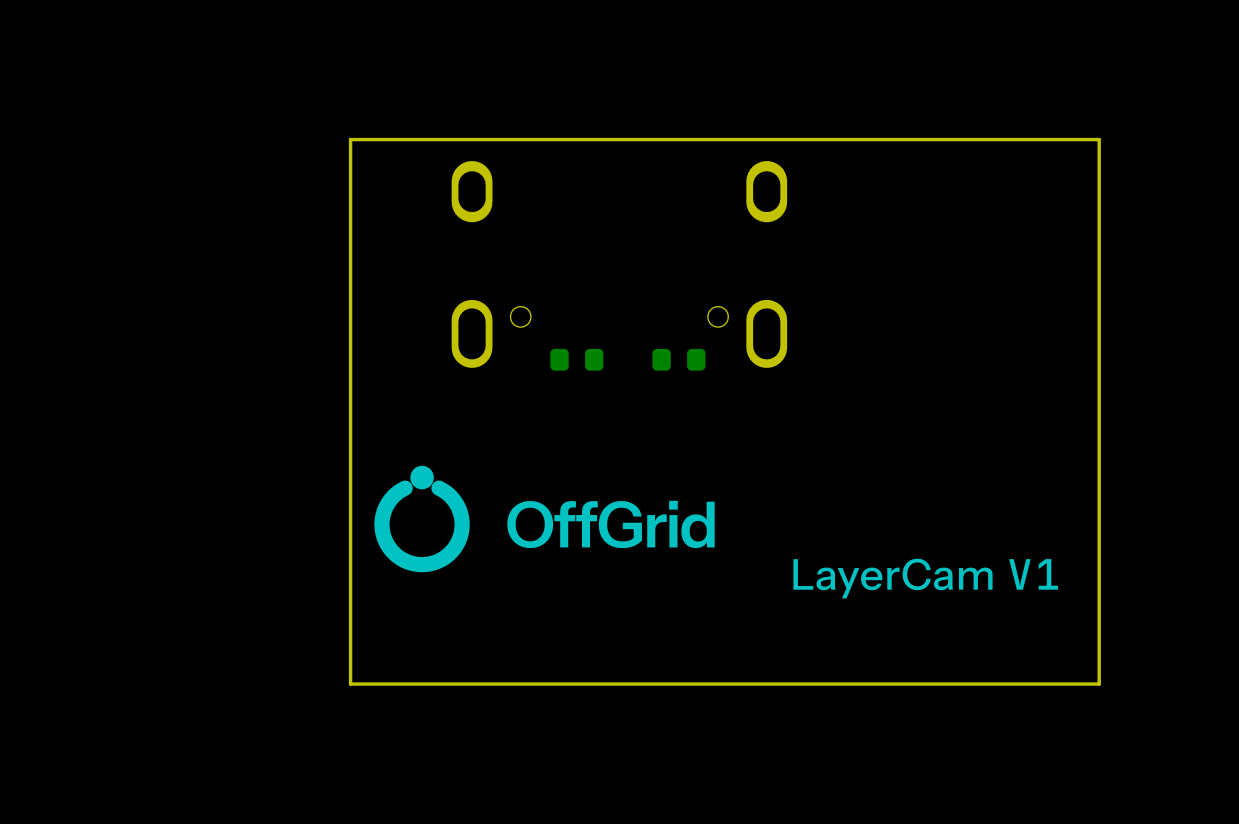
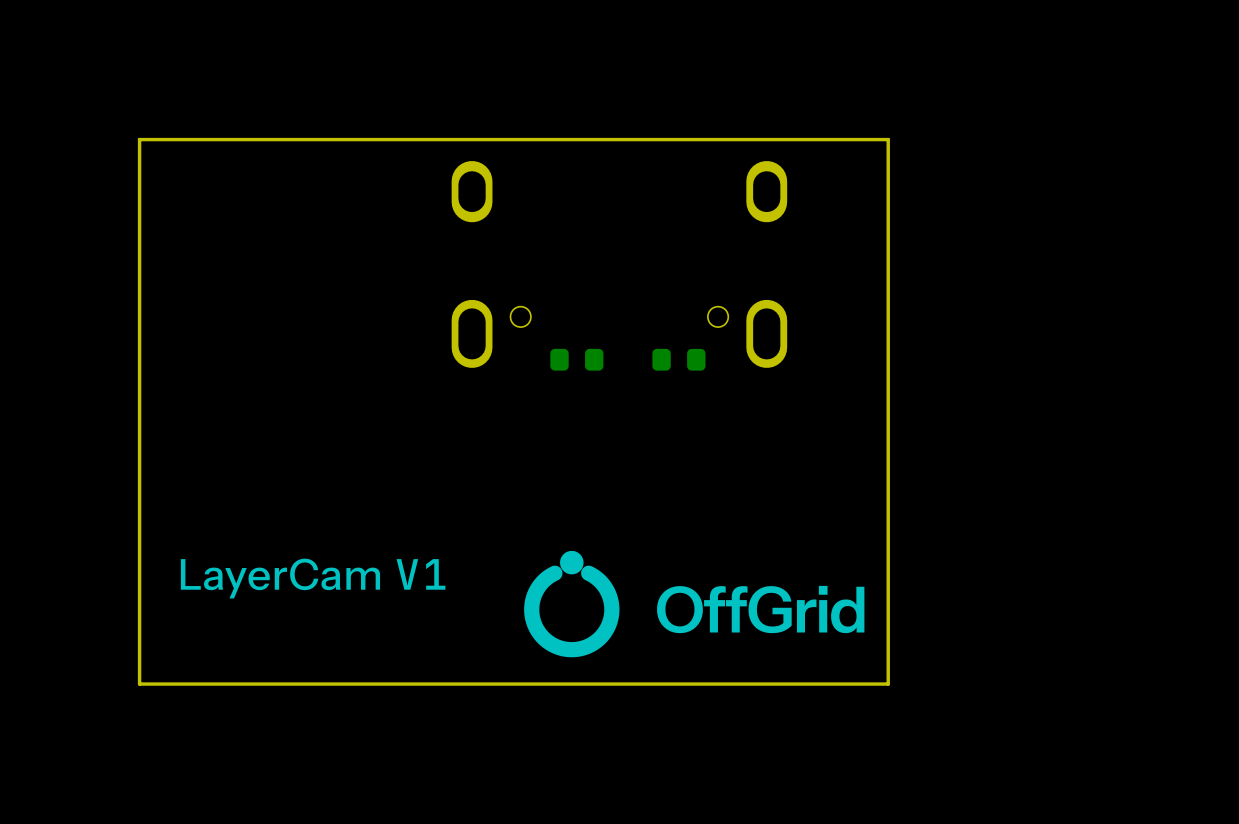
board edge: (350, 139) (350, 684) -> (350, 139) (139, 139) (139, 684) (350, 684)
board edge: (888, 139) (1099, 139) (1099, 684) (888, 684) -> (888, 139) (888, 684)
drawing position: (422, 477) -> (571, 562)
drawing: [554, 501, 598, 548] -> none
drawing position: (673, 505) -> (823, 590)
drawing position: (530, 524) -> (679, 609)
drawing position: (620, 524) -> (770, 609)
drawing position: (698, 524) -> (847, 609)
drawing position: (422, 526) -> (571, 611)
drawing position: (657, 530) -> (806, 615)
drawing position: (673, 531) -> (823, 616)
drawing: none -> [204, 567, 224, 591]
drawing: none -> [321, 567, 341, 591]
drawing: [816, 567, 836, 591] -> none
drawing: [933, 567, 954, 591] -> none
drawing position: (803, 574) -> (190, 574)
drawing position: (916, 574) -> (304, 574)
drawing position: (1019, 574) -> (407, 574)
drawing position: (1048, 574) -> (435, 574)
drawing position: (871, 578) -> (259, 578)
drawing position: (893, 578) -> (280, 578)
drawing position: (975, 578) -> (363, 578)
drawing position: (848, 583) -> (235, 583)
drawing: none -> [704, 586, 748, 633]

